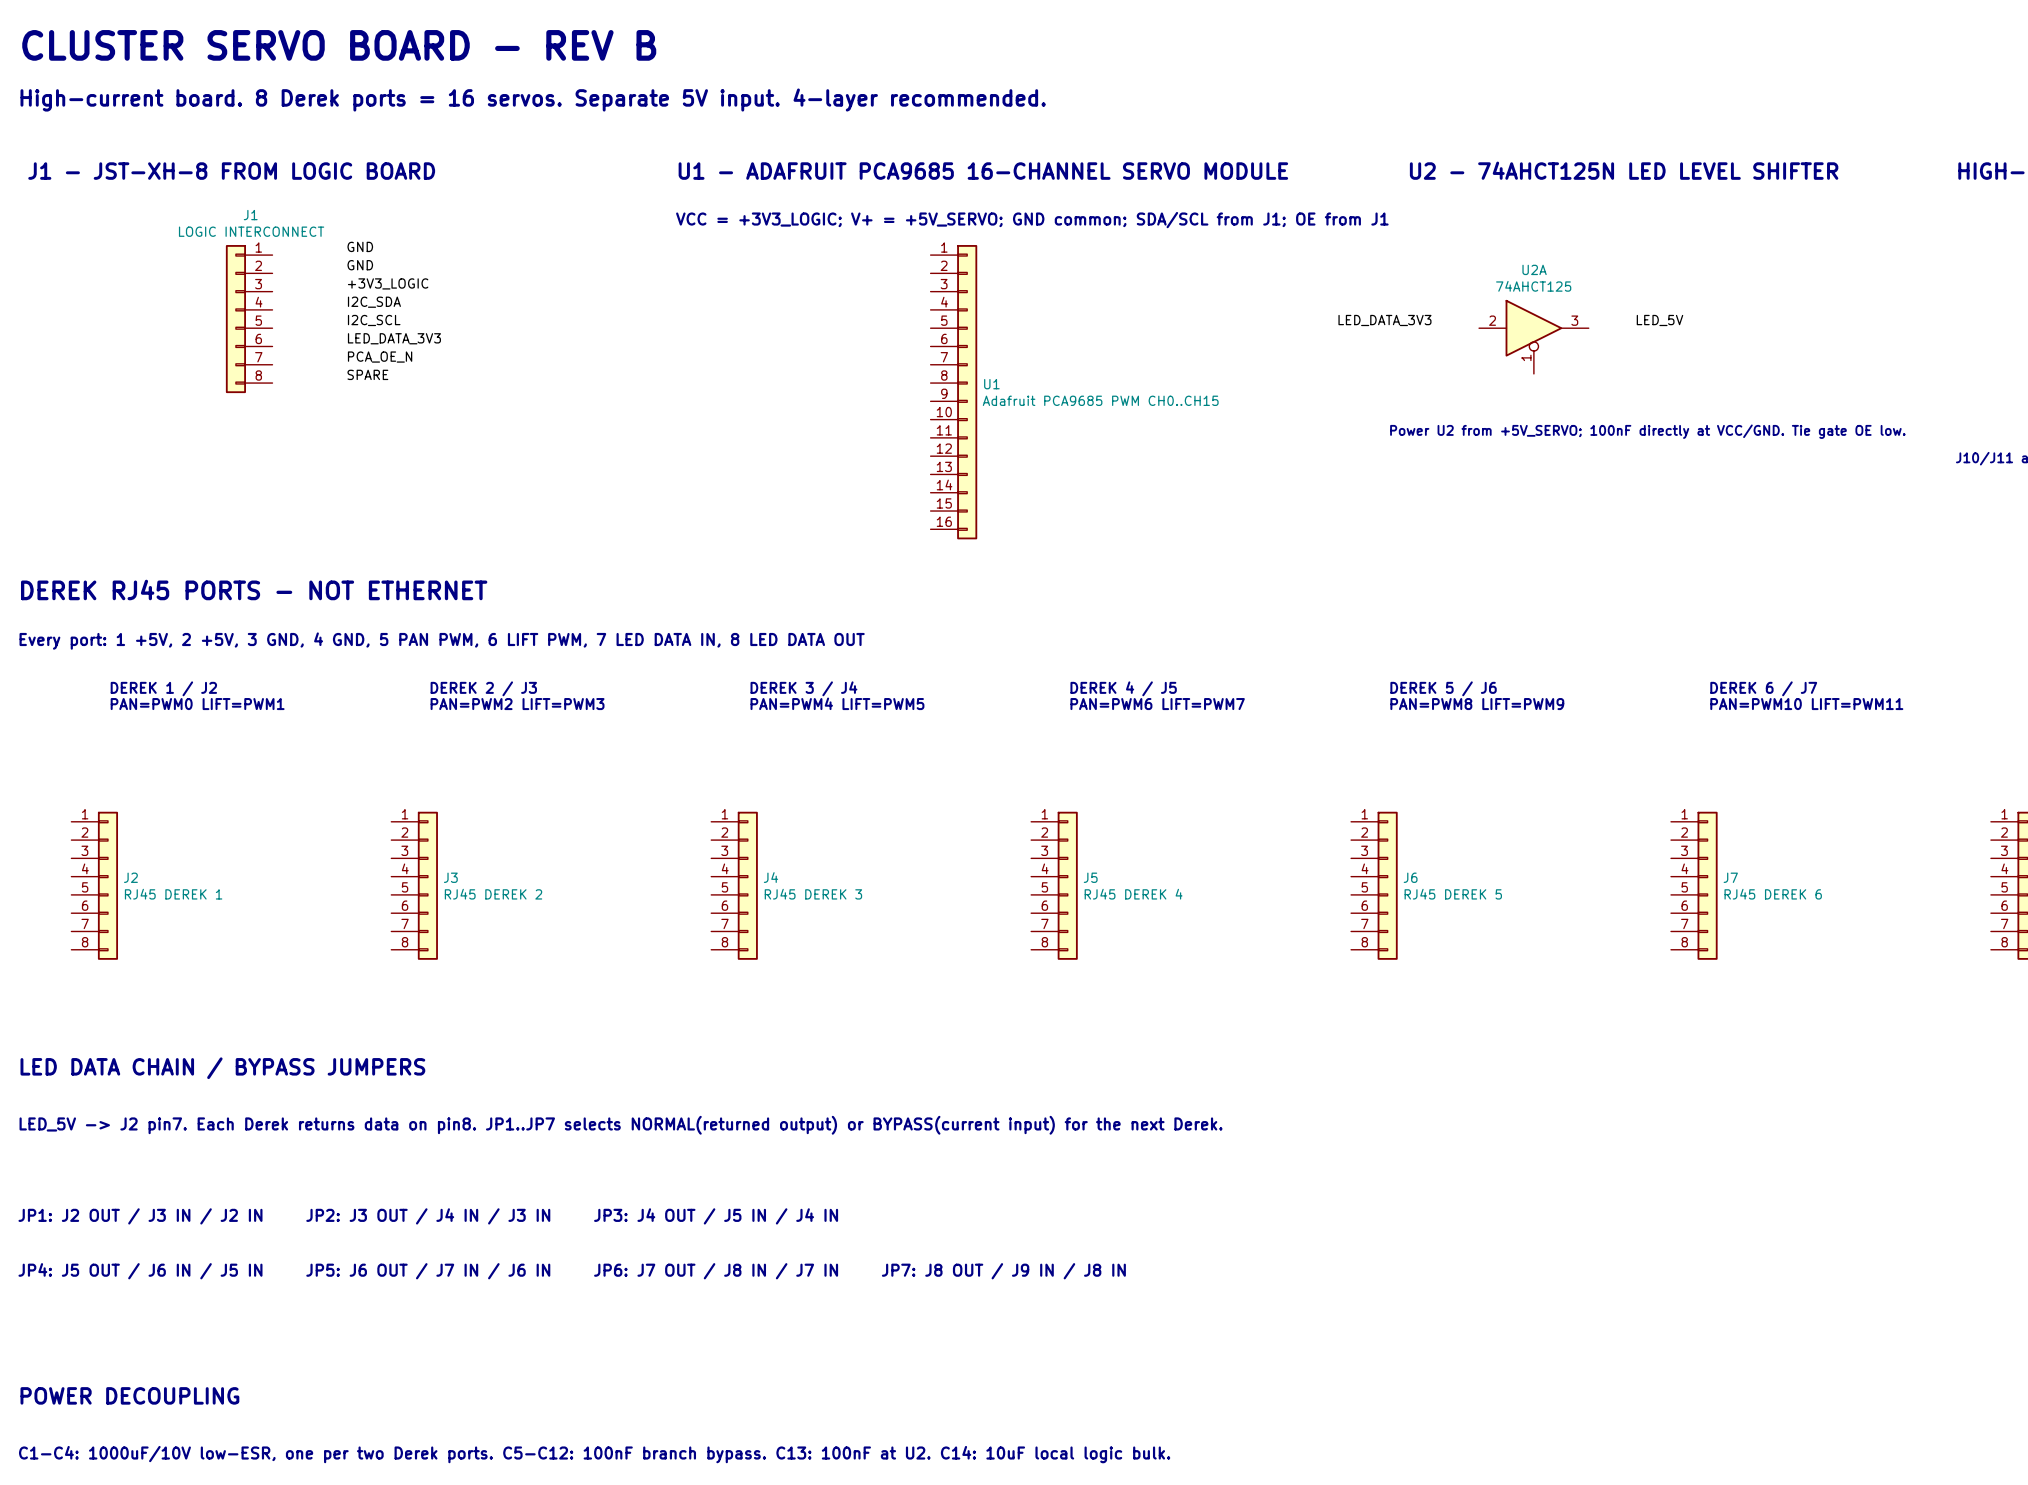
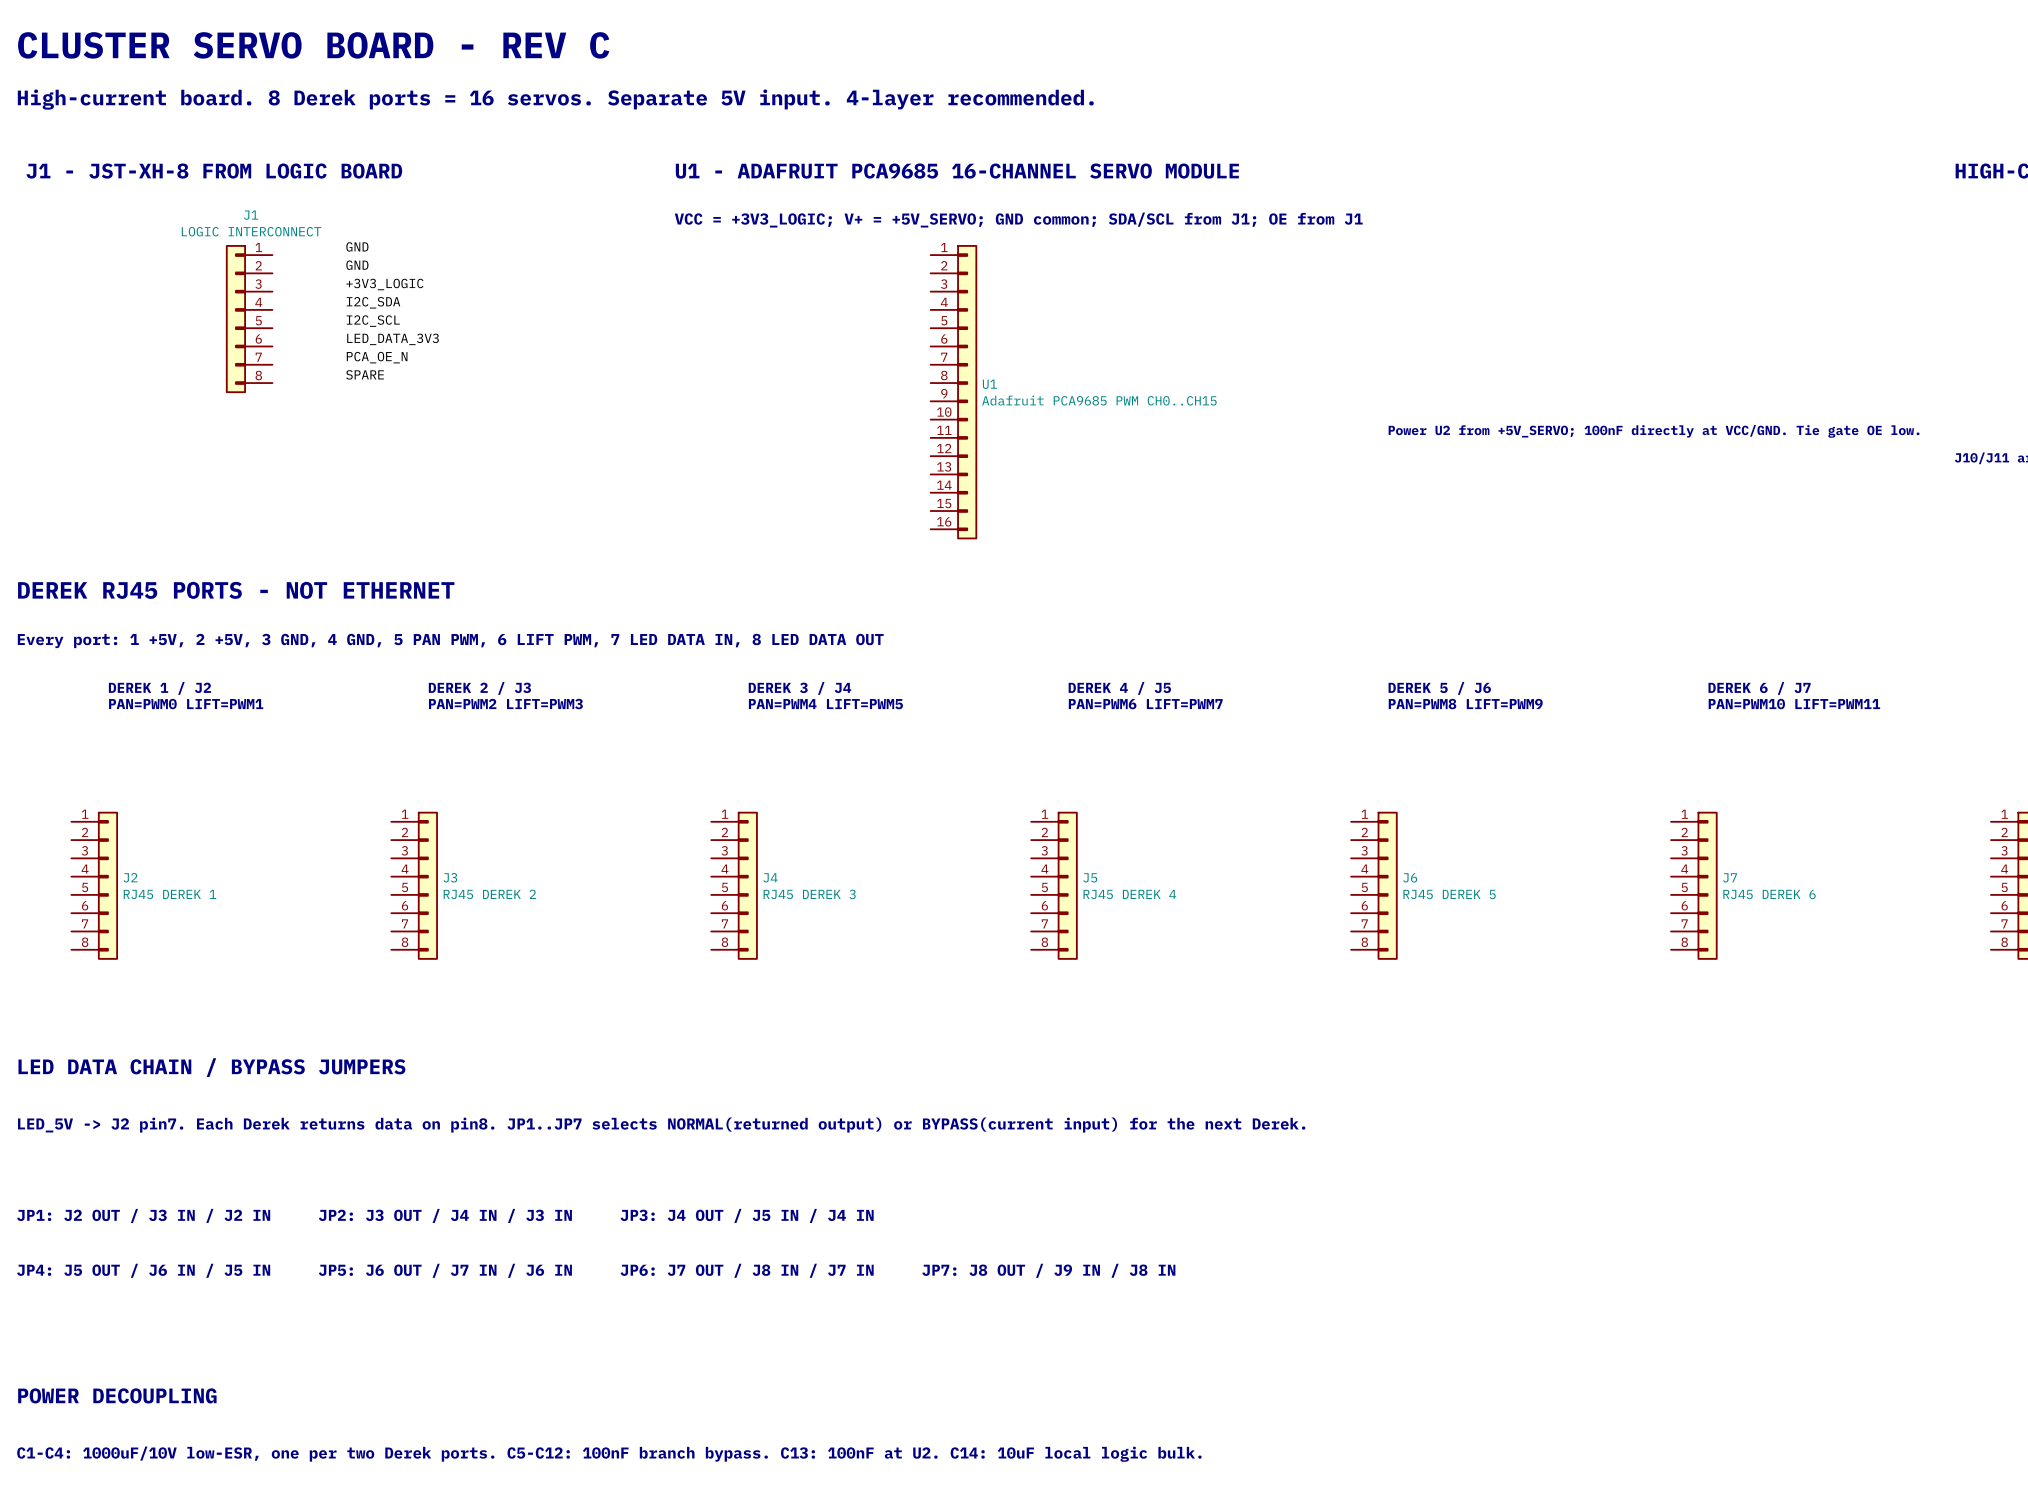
text: CLUSTER SERVO BOARD - REV B (339, 45) -> CLUSTER SERVO BOARD - REV C (313, 45)
text: U2 - 74AHCT125N LED LEVEL SHIFTER (1624, 170) -> none
label: LED_DATA_3V3 (1384, 320) -> none
label: LED_5V (1659, 320) -> none
U2A: 74AHCT125 (1533, 336) -> none

